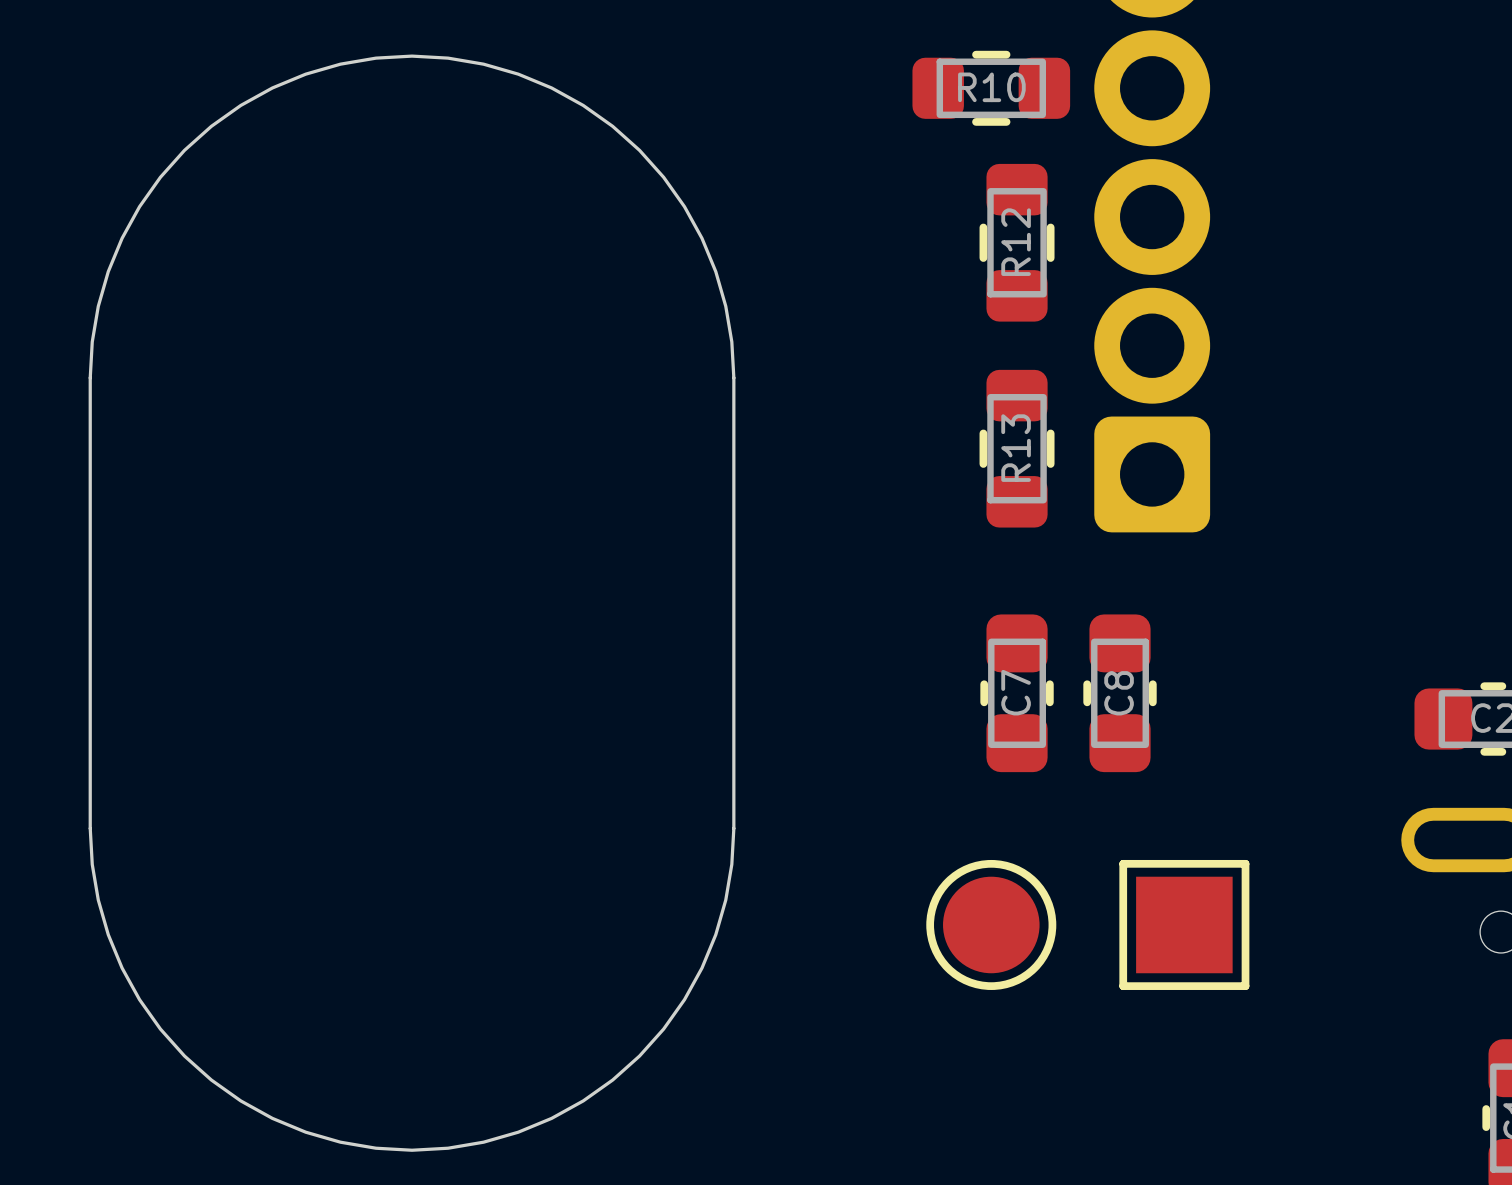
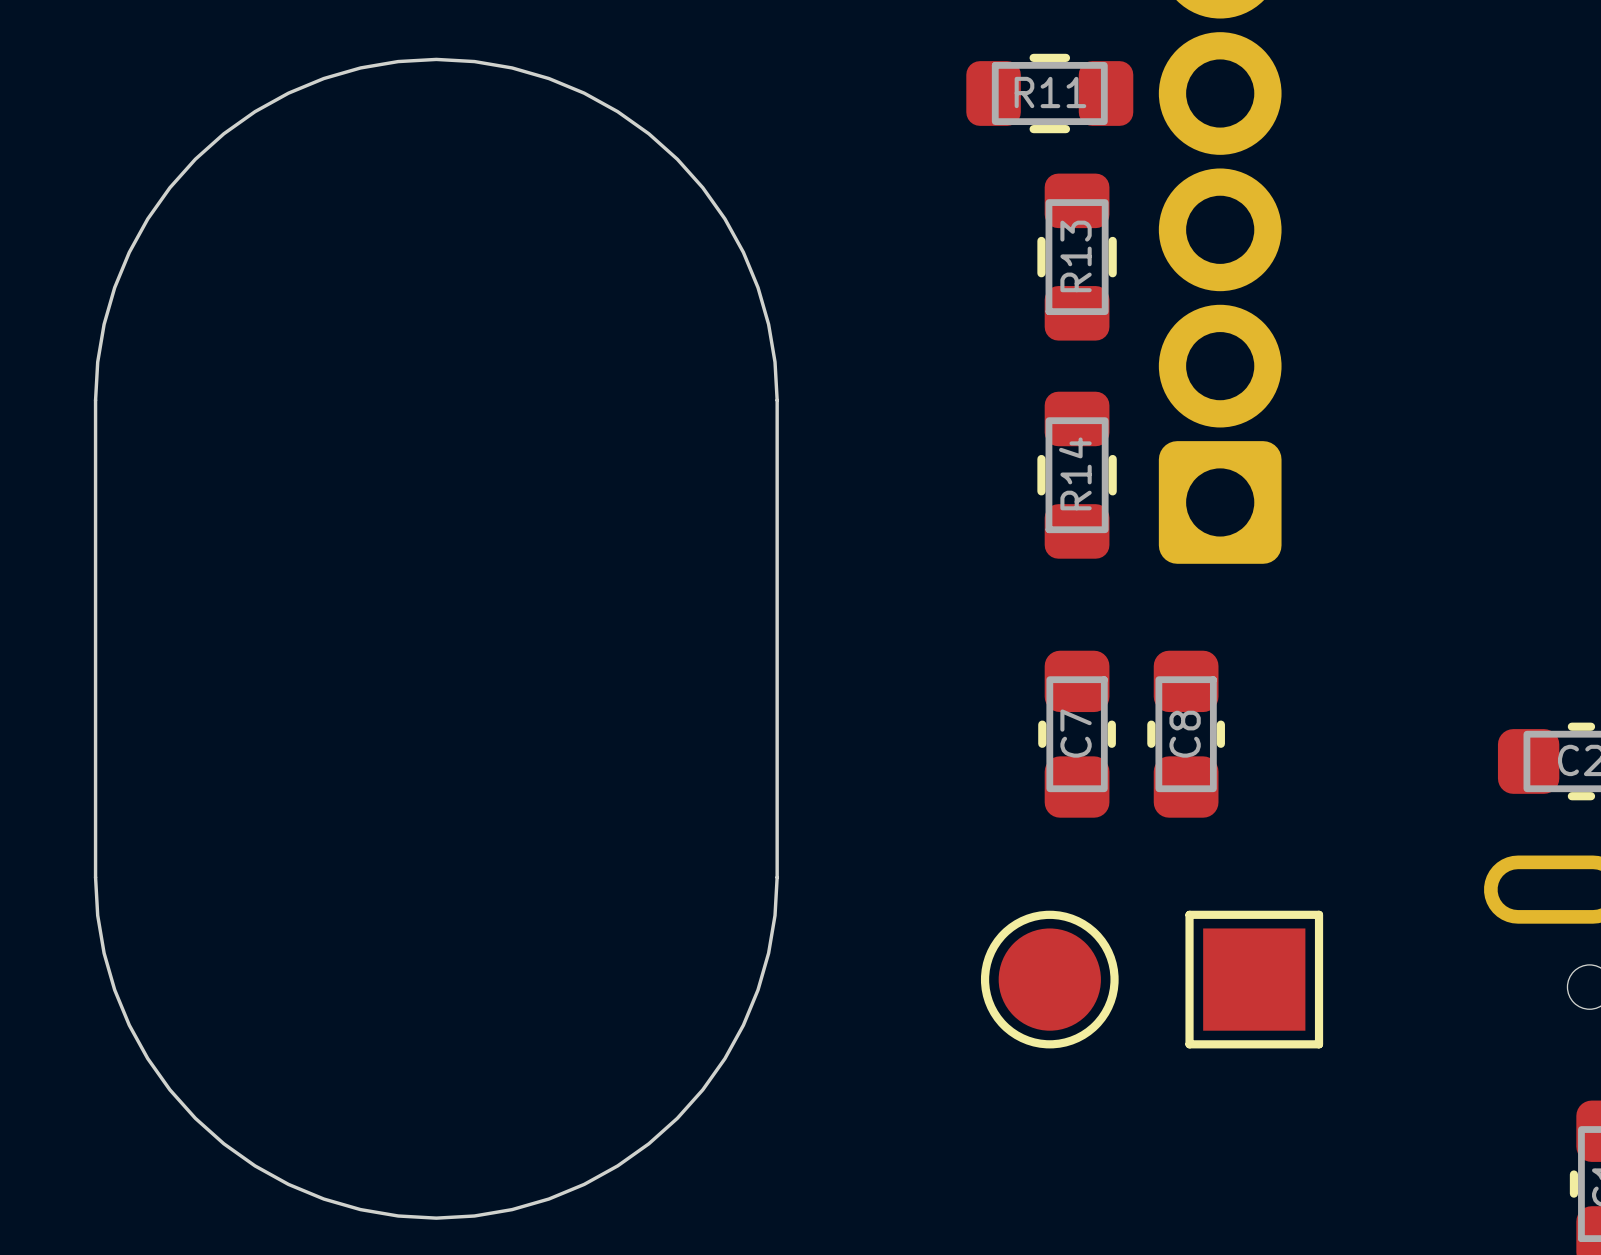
R10 name: R10 (991, 87) -> R11 (1050, 92)
R12 name: R12 (1016, 242) -> R13 (1076, 256)
R13 name: R13 (1016, 448) -> R14 (1075, 473)

